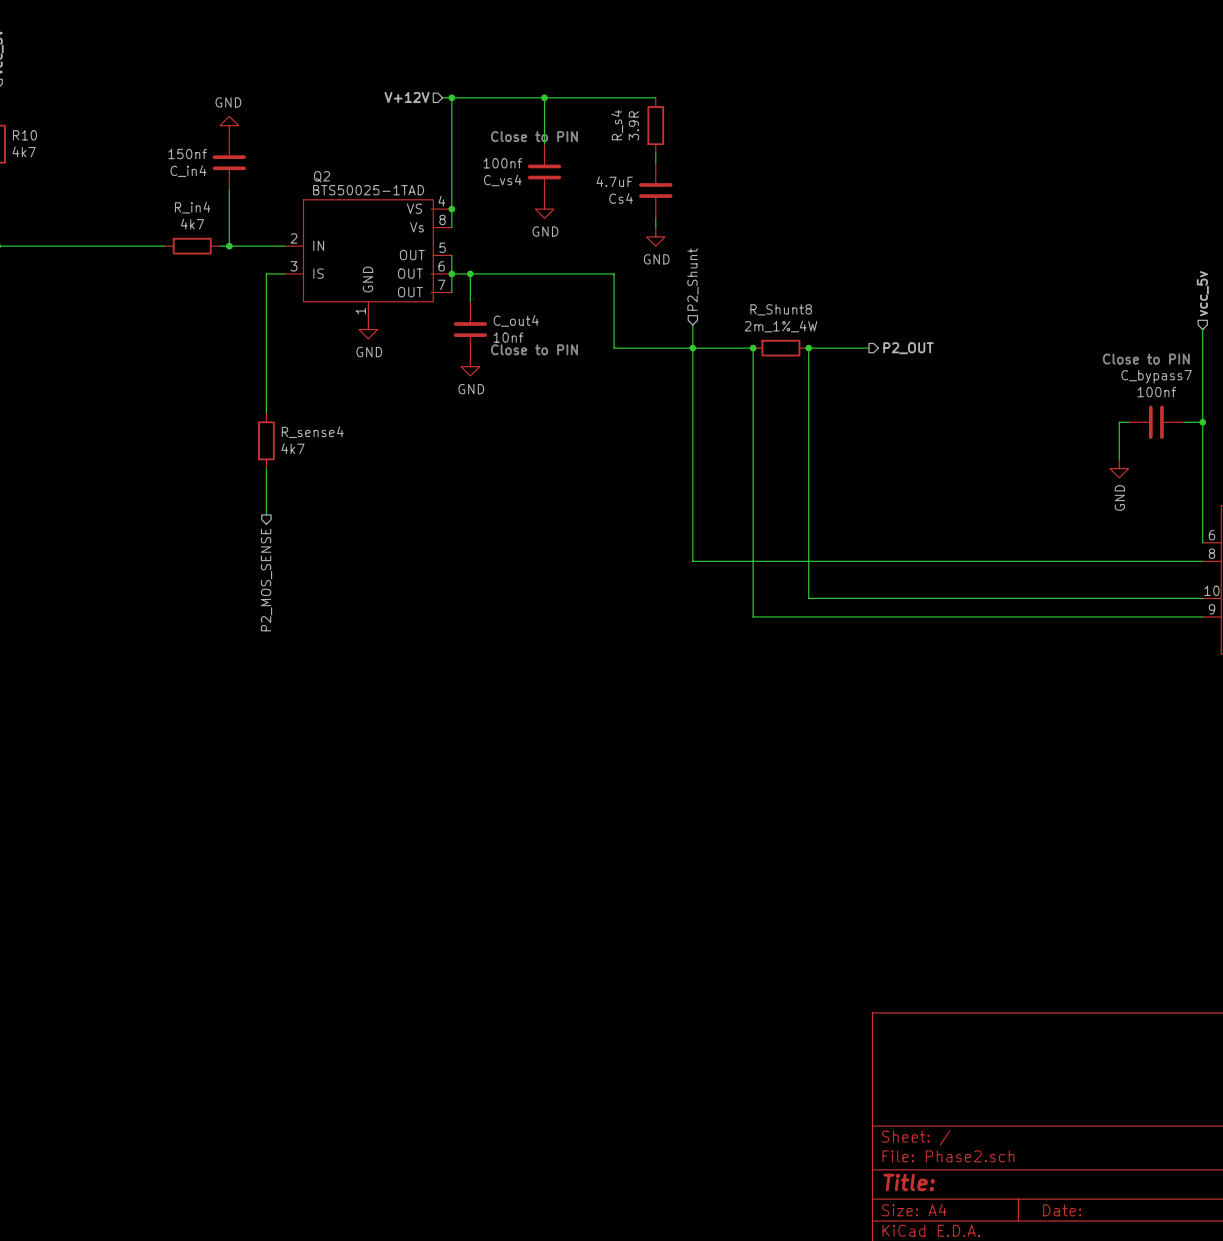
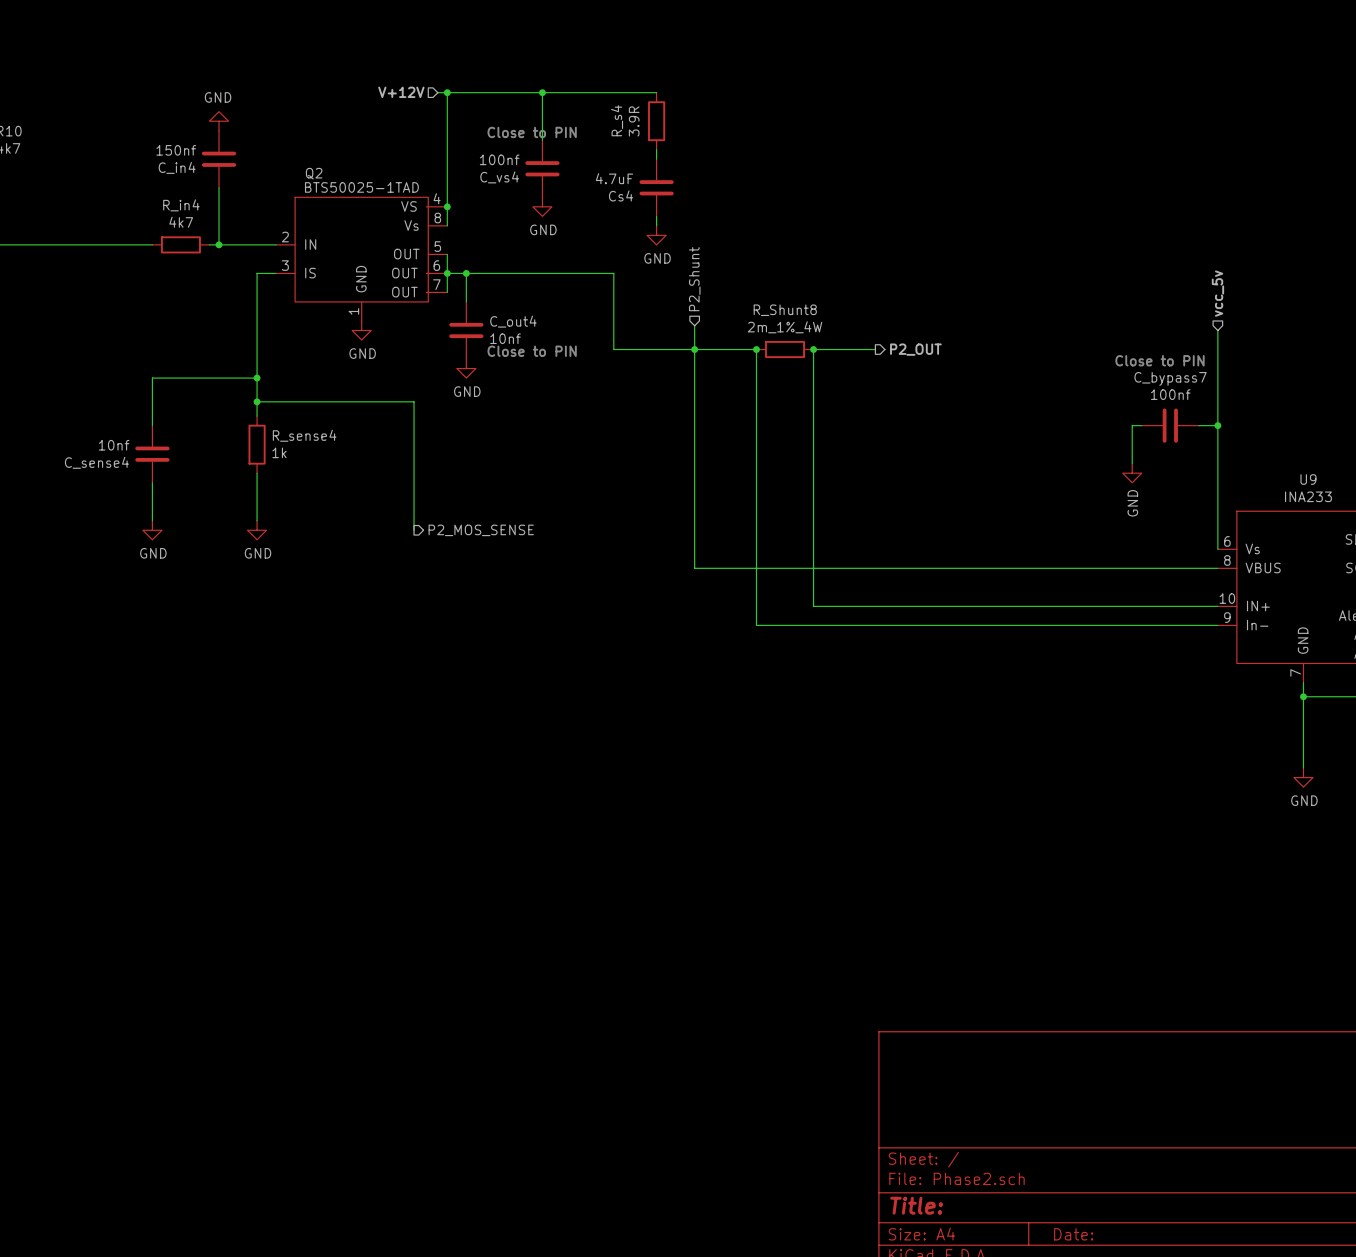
wire: none -> (257, 378) (152, 378) (152, 425)
junction: none -> (257, 378)
wire: none -> (257, 401) (414, 401) (414, 530)
junction: none -> (257, 401)
R_sense4 value: 4k7 (292, 448) -> 1k (279, 452)
C_sense4: none -> 10nf (152, 454)
wire: none -> (152, 482) (152, 520)
power symbol: none -> GND (152, 530)
power symbol: none -> GND (257, 530)
hierarchical label rotation: 0° (266, 580) -> 90° counterclockwise (481, 530)
hierarchical label position: P2_MOS_SENSE (266, 580) -> P2_MOS_SENSE (481, 530)

